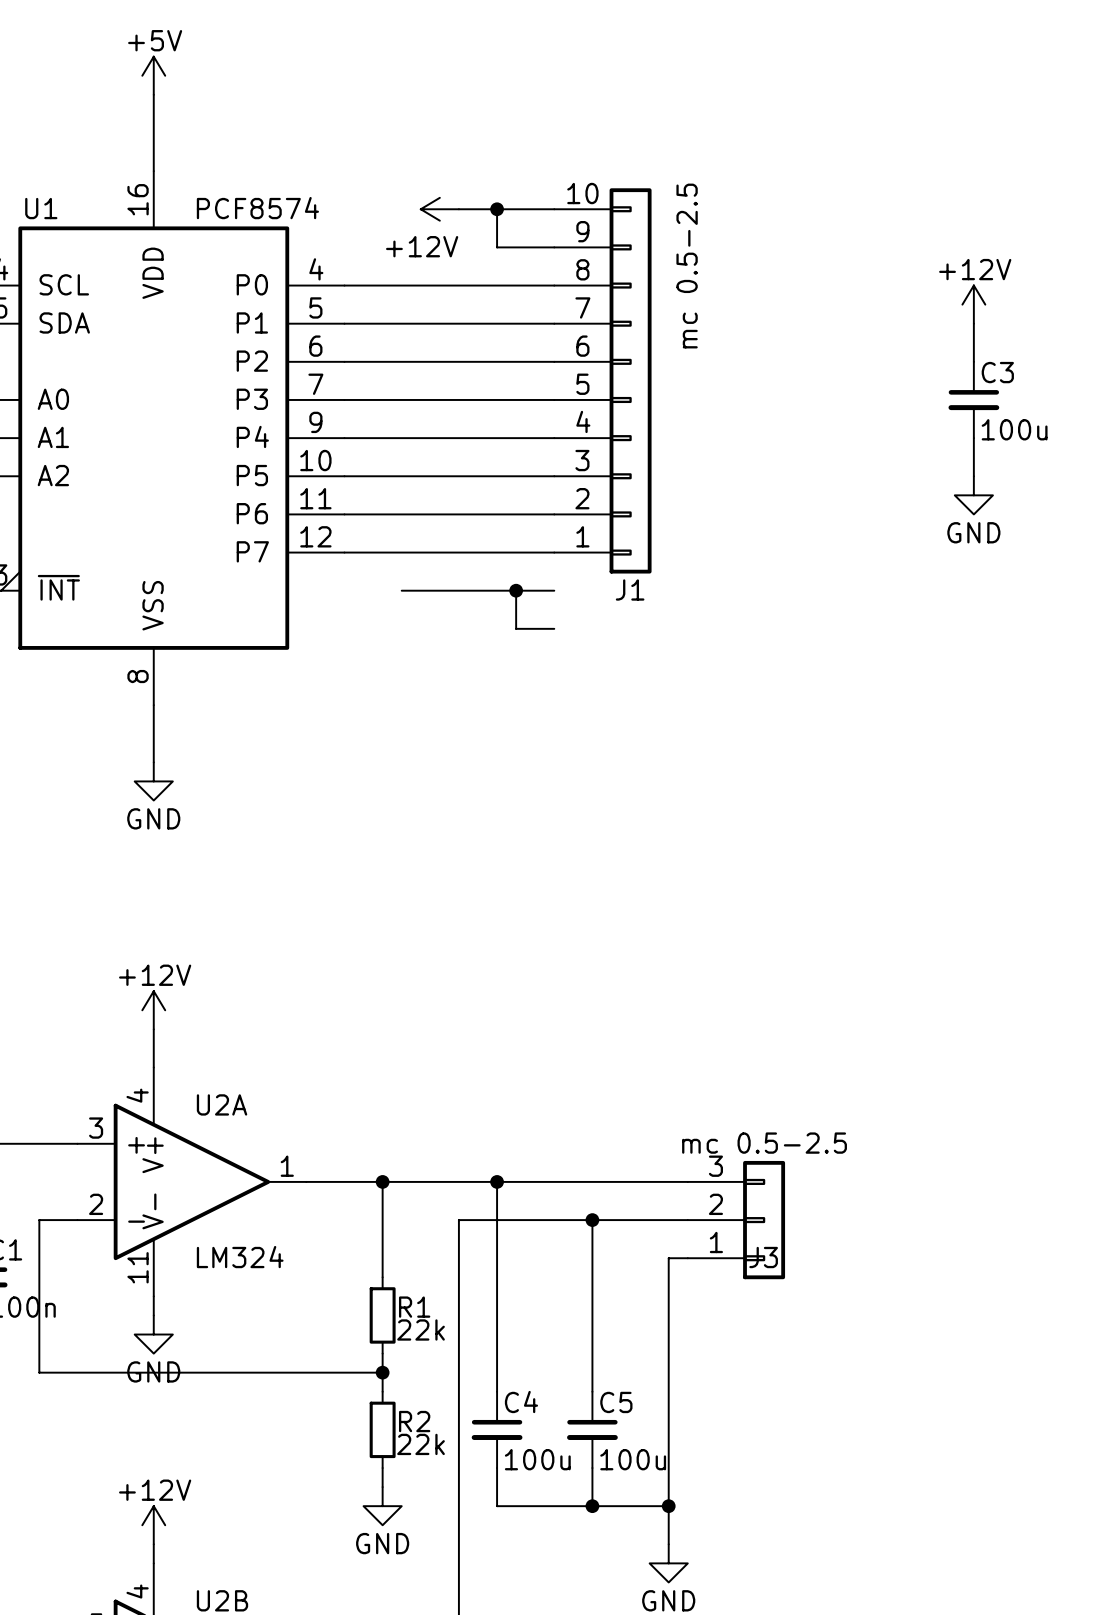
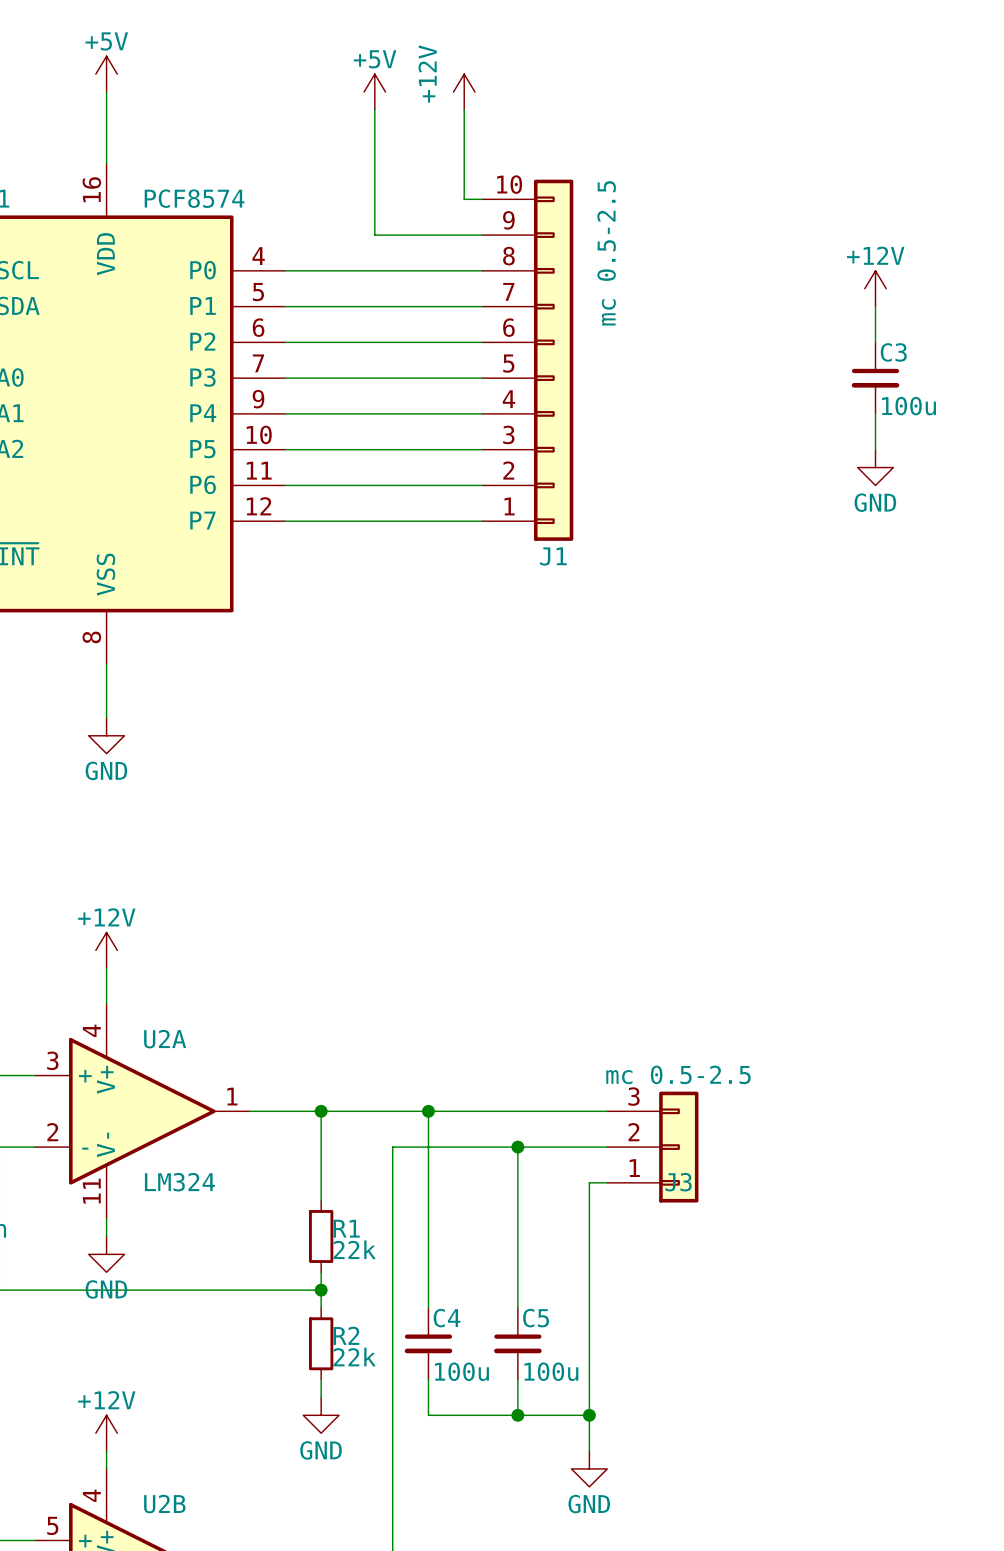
power symbol: none -> +5V (374, 92)
power symbol rotation: 0° (439, 209) -> 90° clockwise (464, 92)
power symbol position: +12V (439, 209) -> +12V (464, 92)
wire: (458, 209) (535, 209) -> (464, 109) (464, 199)
wire: (497, 209) (497, 247) -> (374, 109) (374, 235) (428, 235)
junction: (497, 209) -> none
wire: (401, 590) (554, 590) -> none
wire: (516, 590) (516, 628) (554, 628) -> none
junction: (516, 590) -> none

